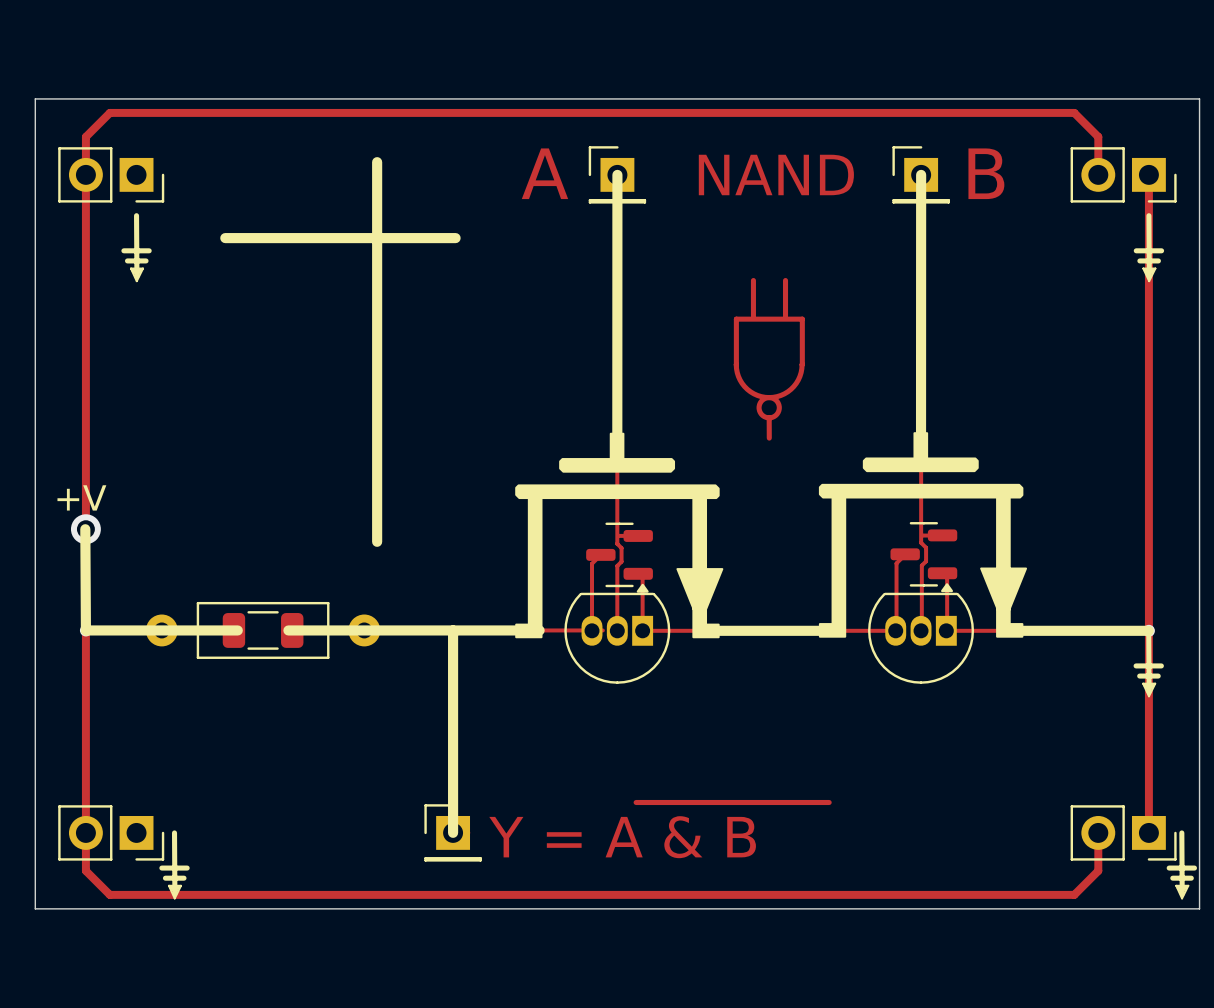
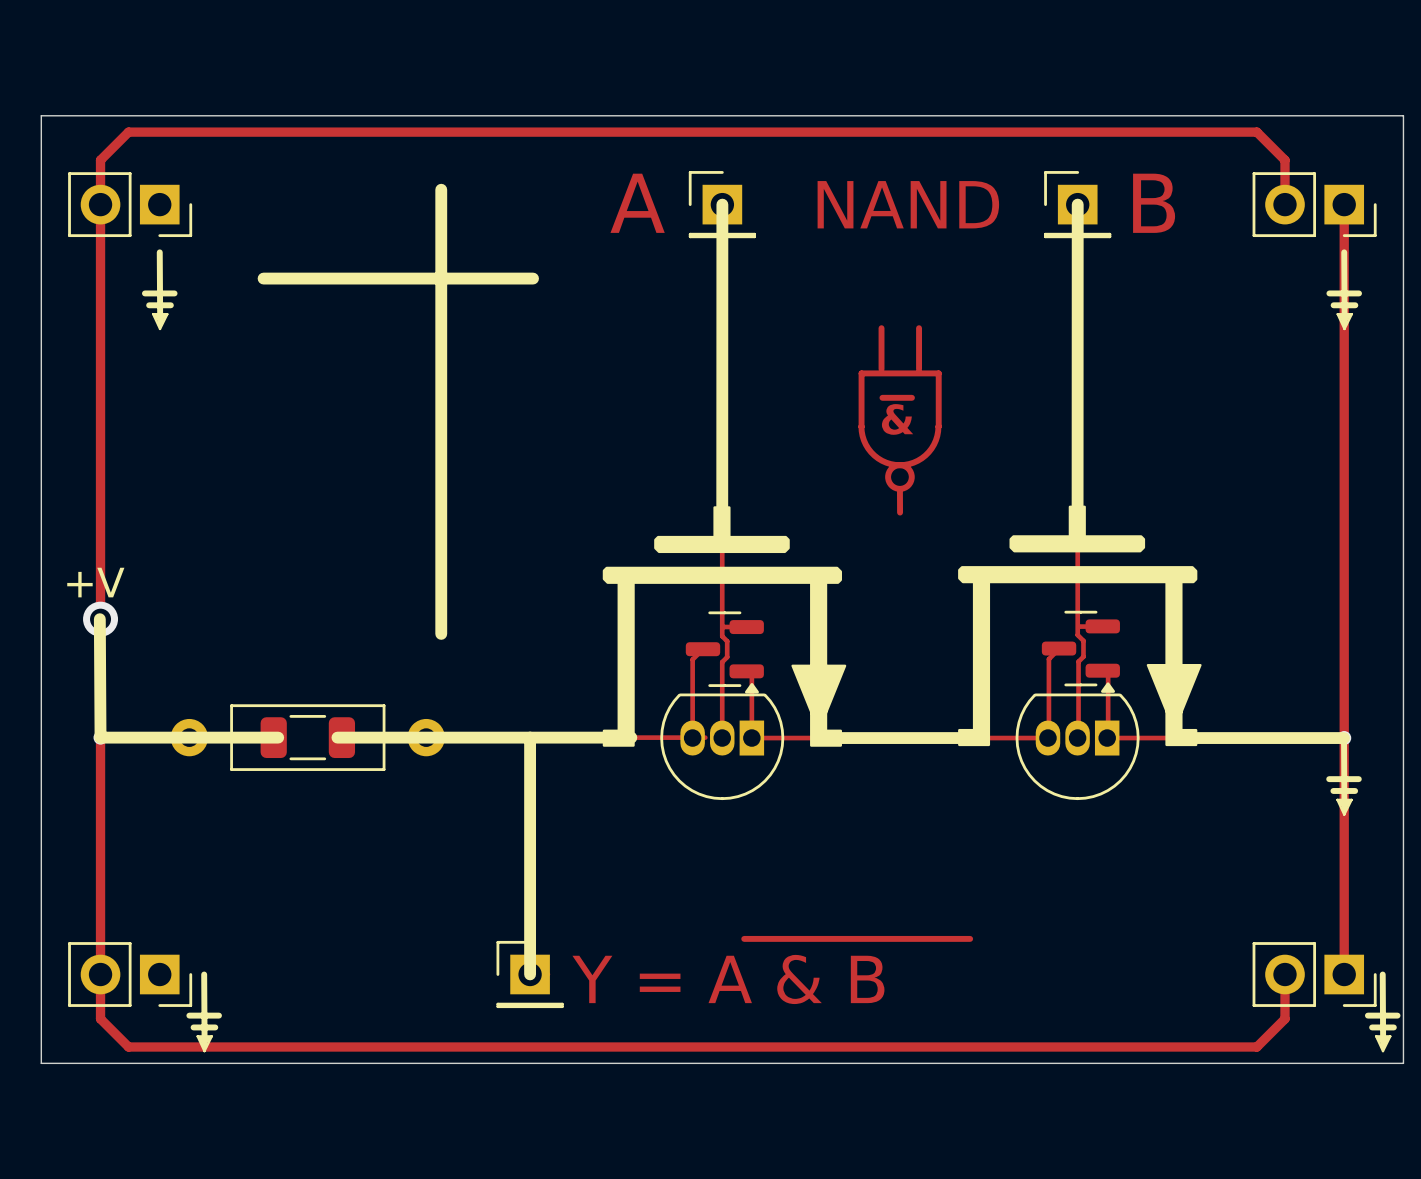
text: none -> ~{&} (897, 416)

